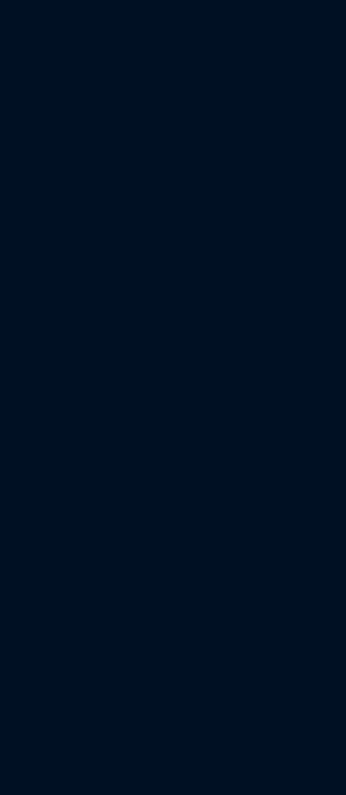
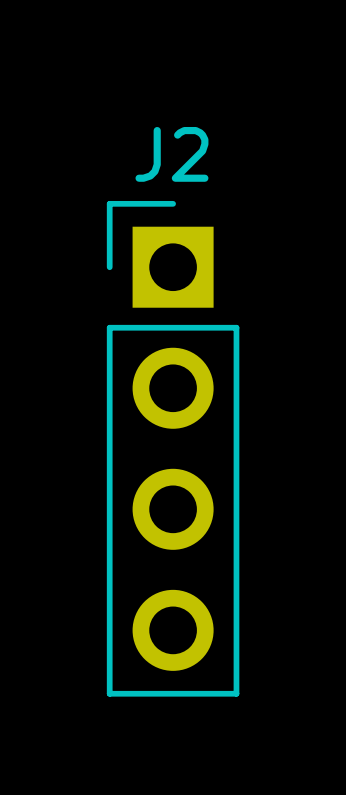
J2: none -> (173, 448)

